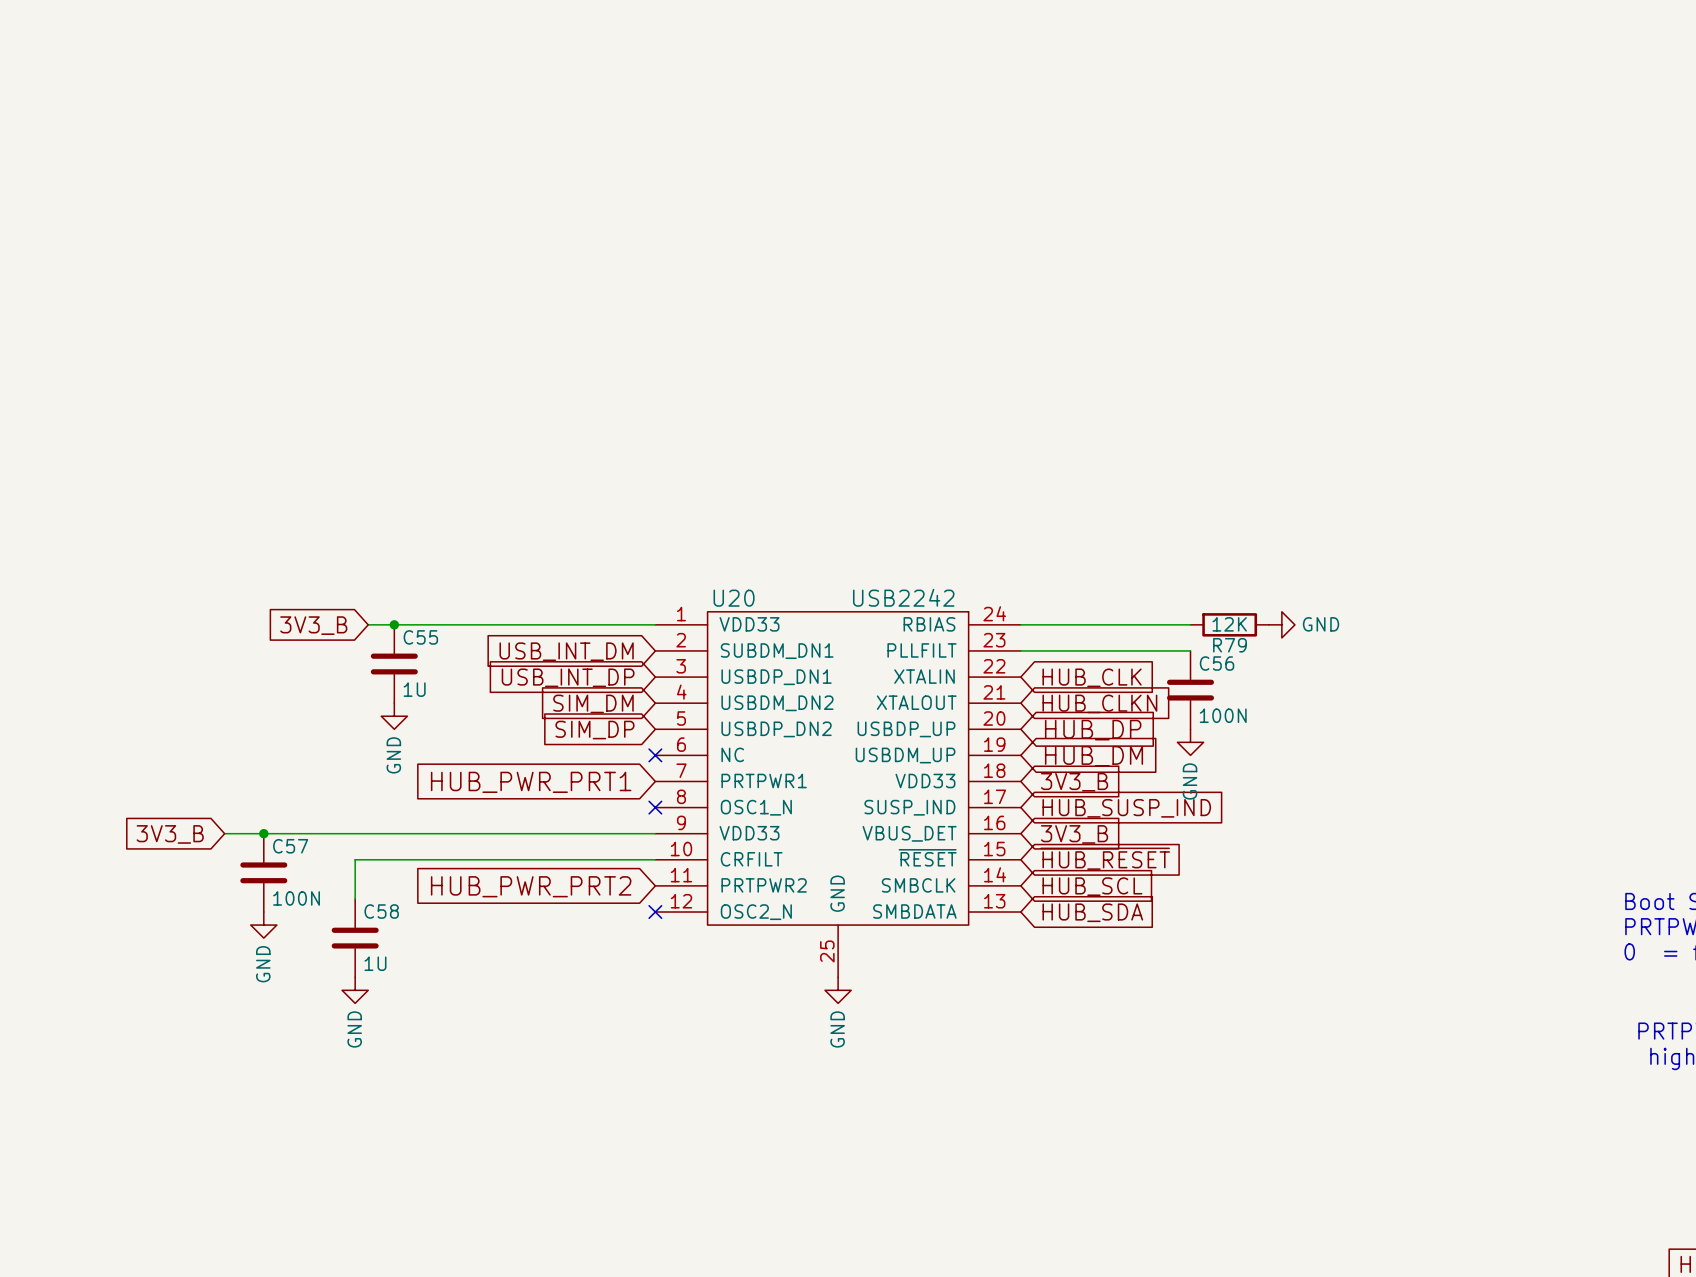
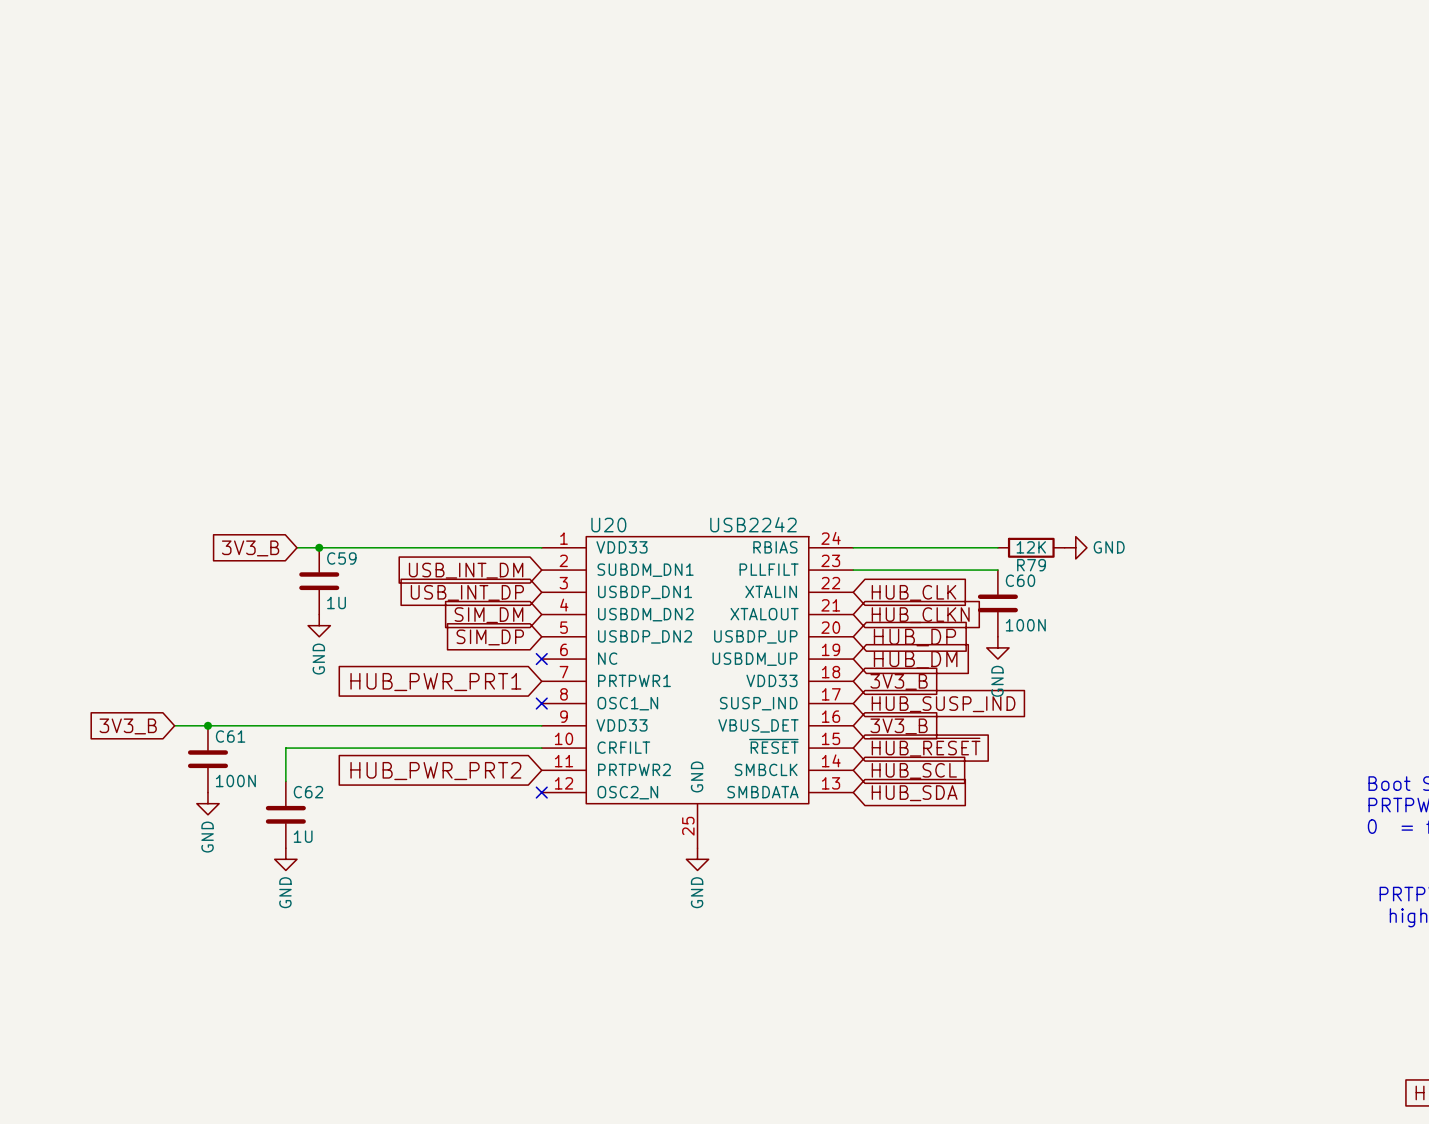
C55 name: C55 (420, 637) -> C59 (341, 558)
C56 name: C56 (1217, 663) -> C60 (1020, 580)
C57 name: C57 (290, 846) -> C61 (230, 736)
C58 name: C58 (381, 911) -> C62 (308, 792)

